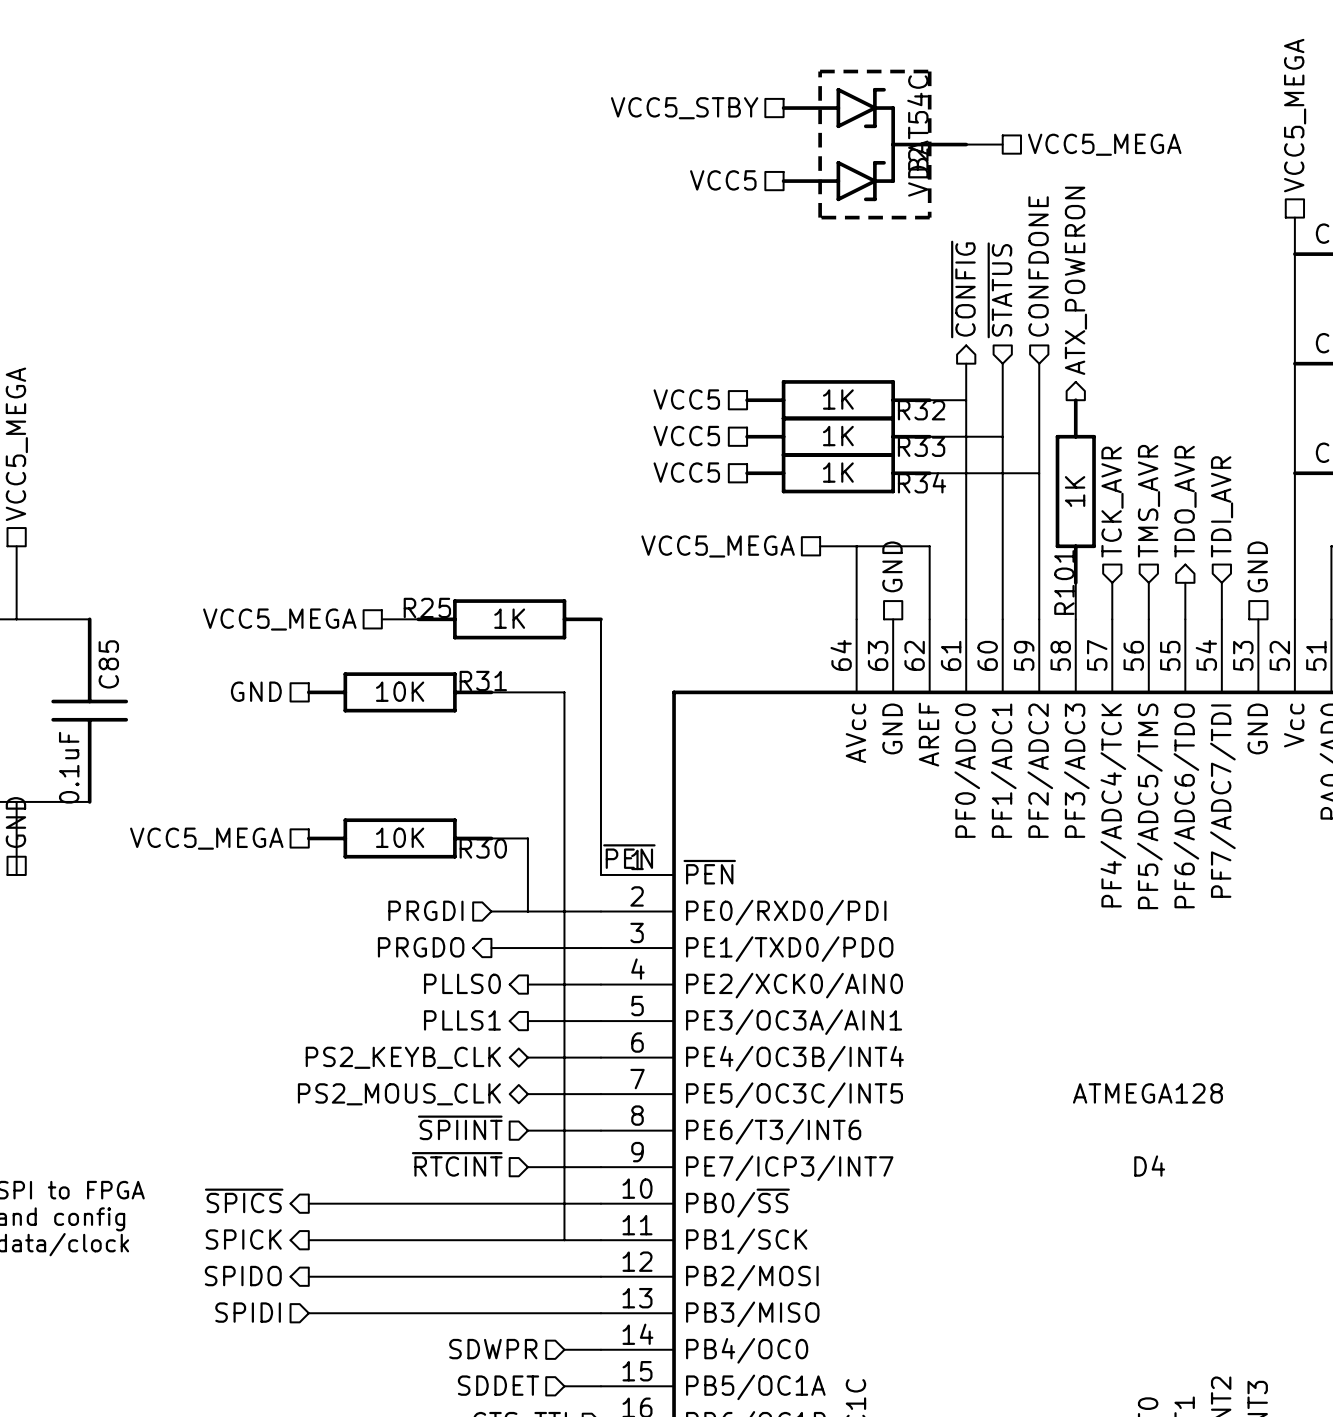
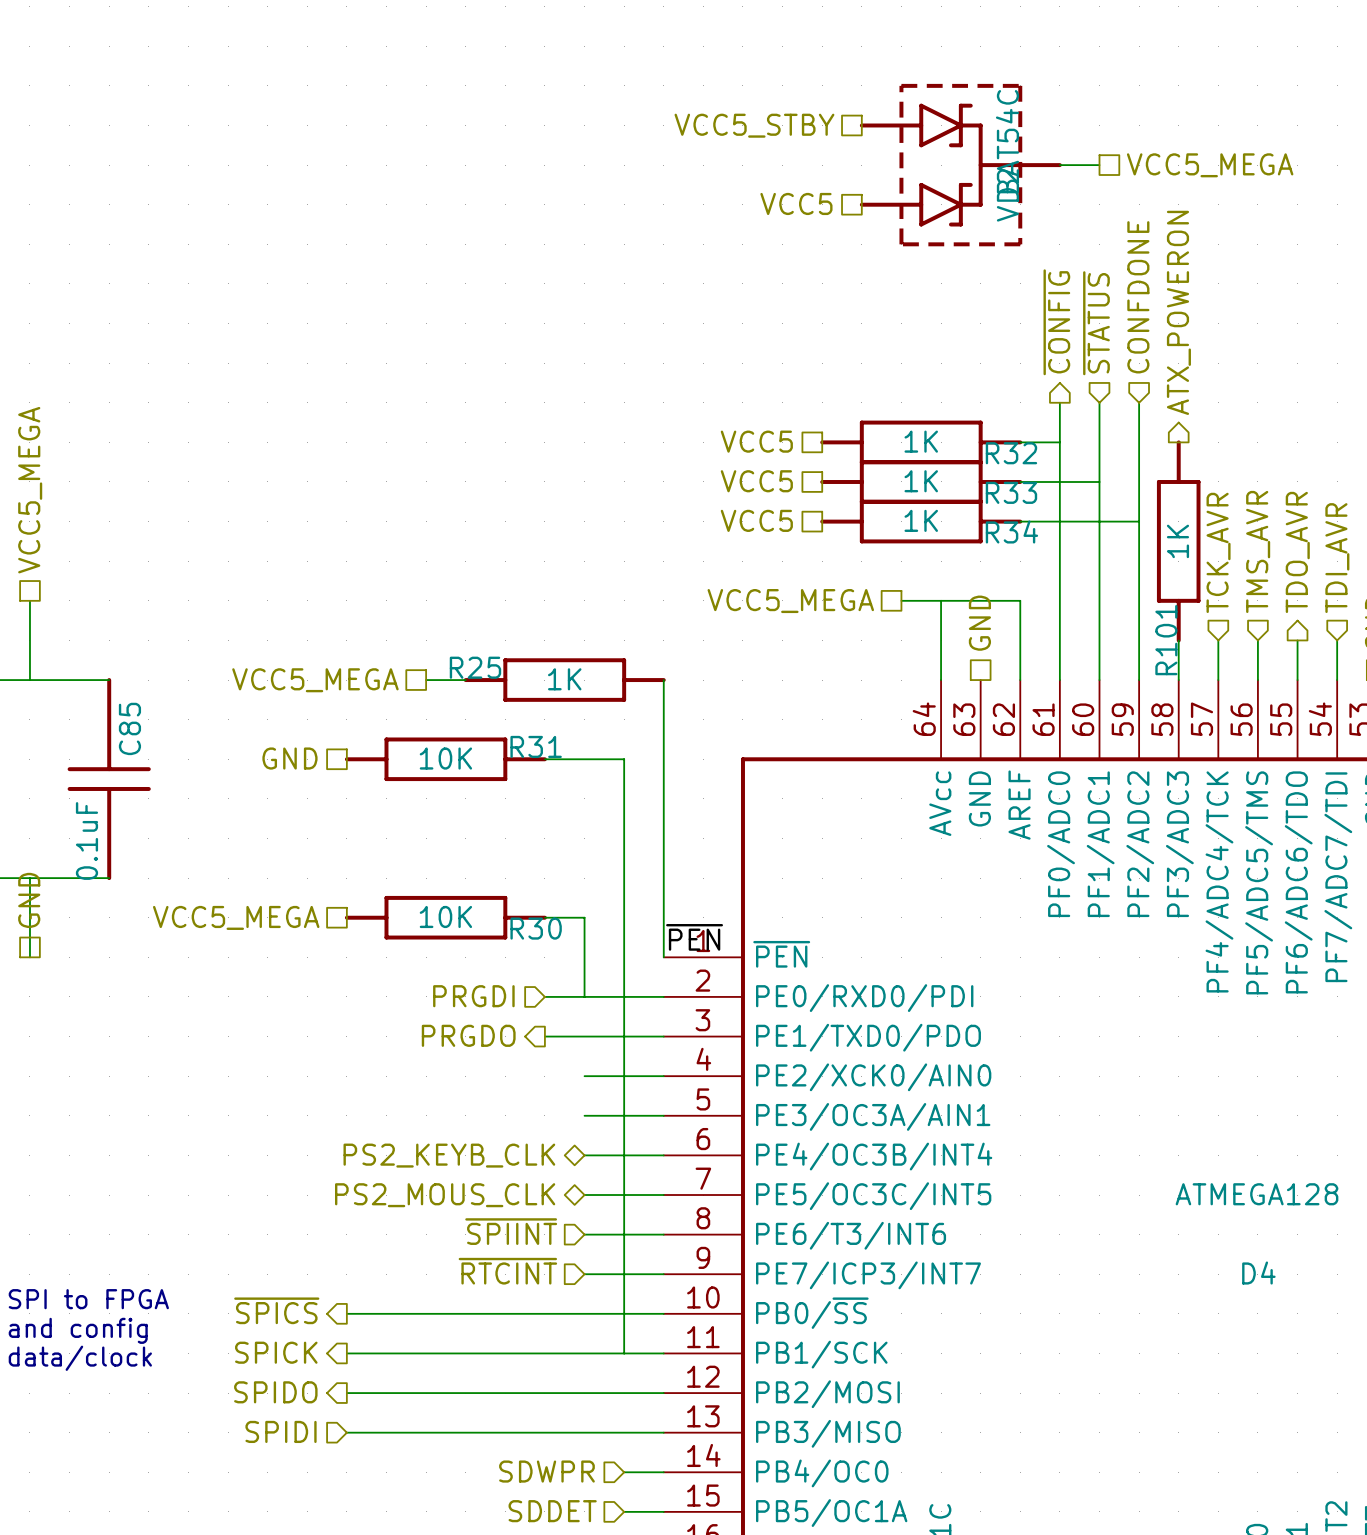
hierarchical label: PLLS0 (462, 983) -> none
hierarchical label: PLLS1 (462, 1020) -> none

